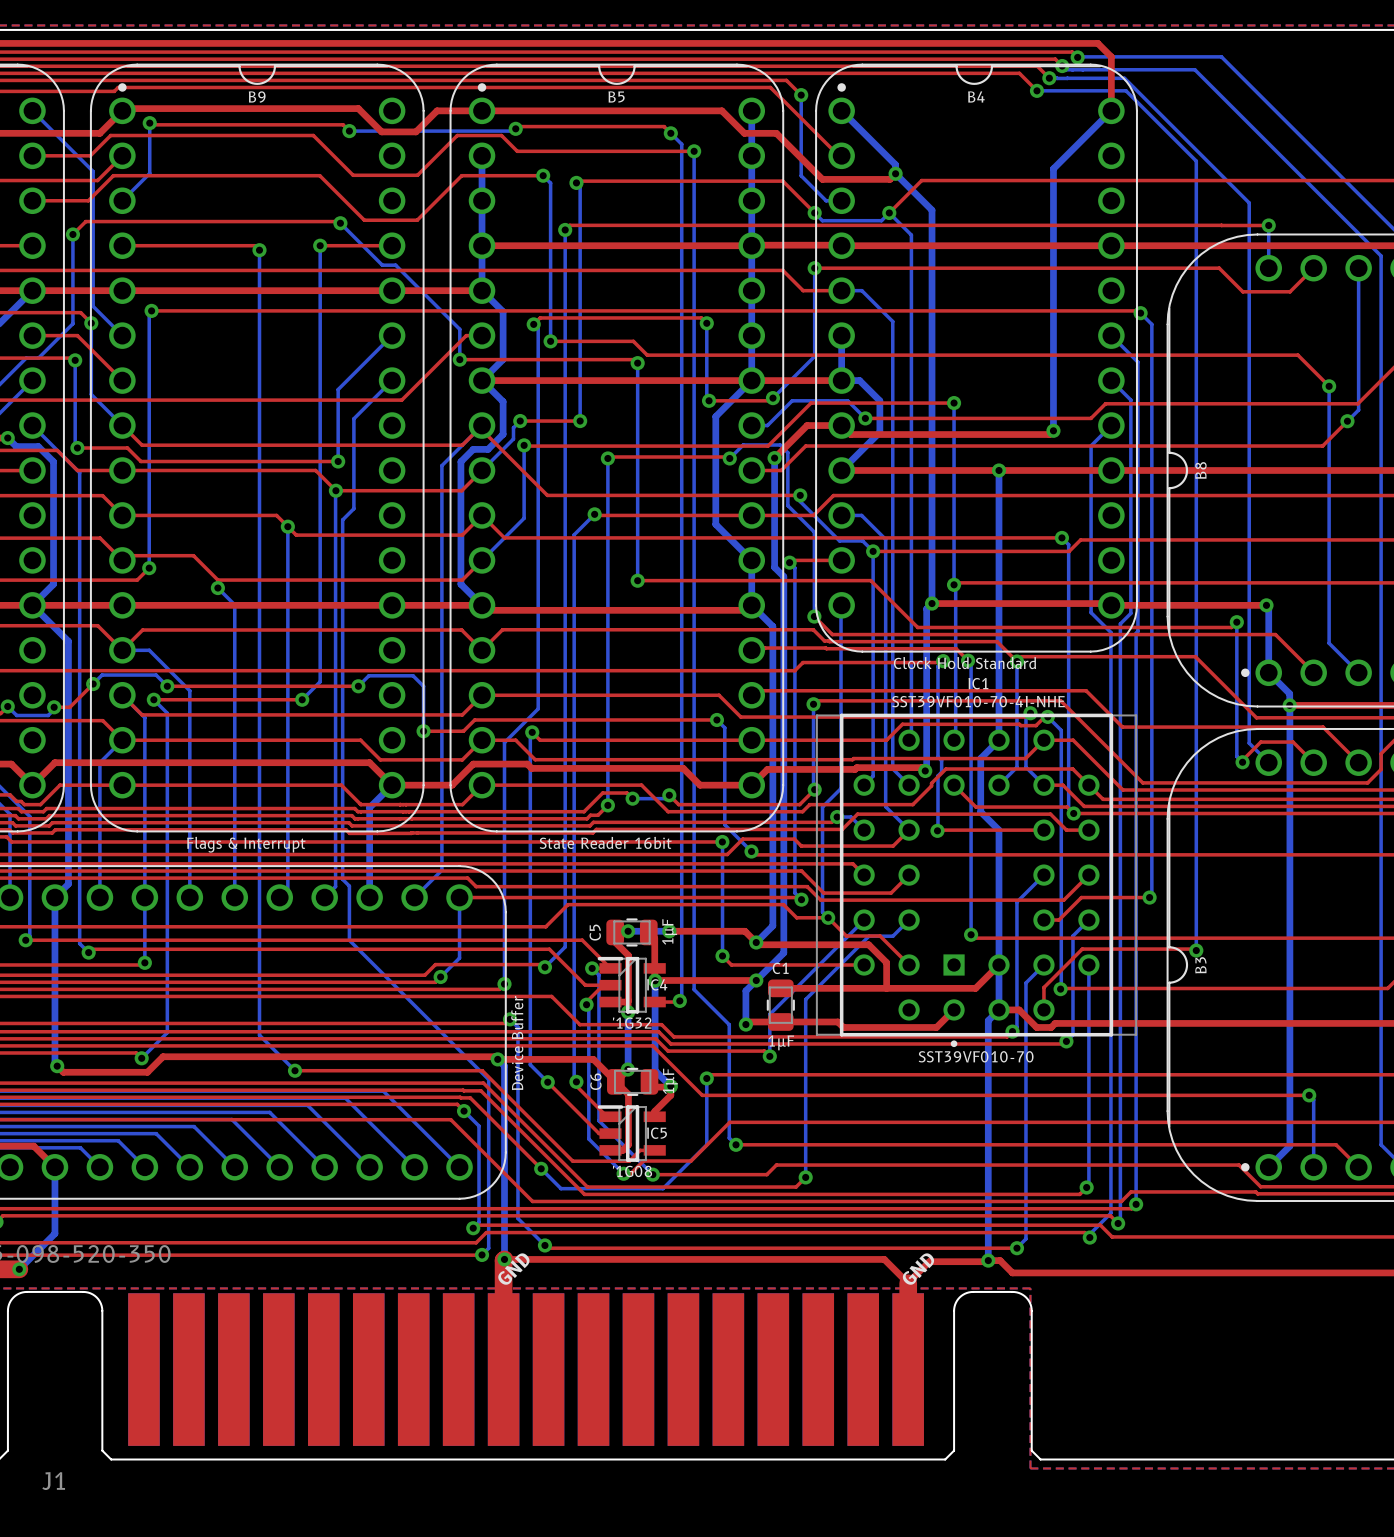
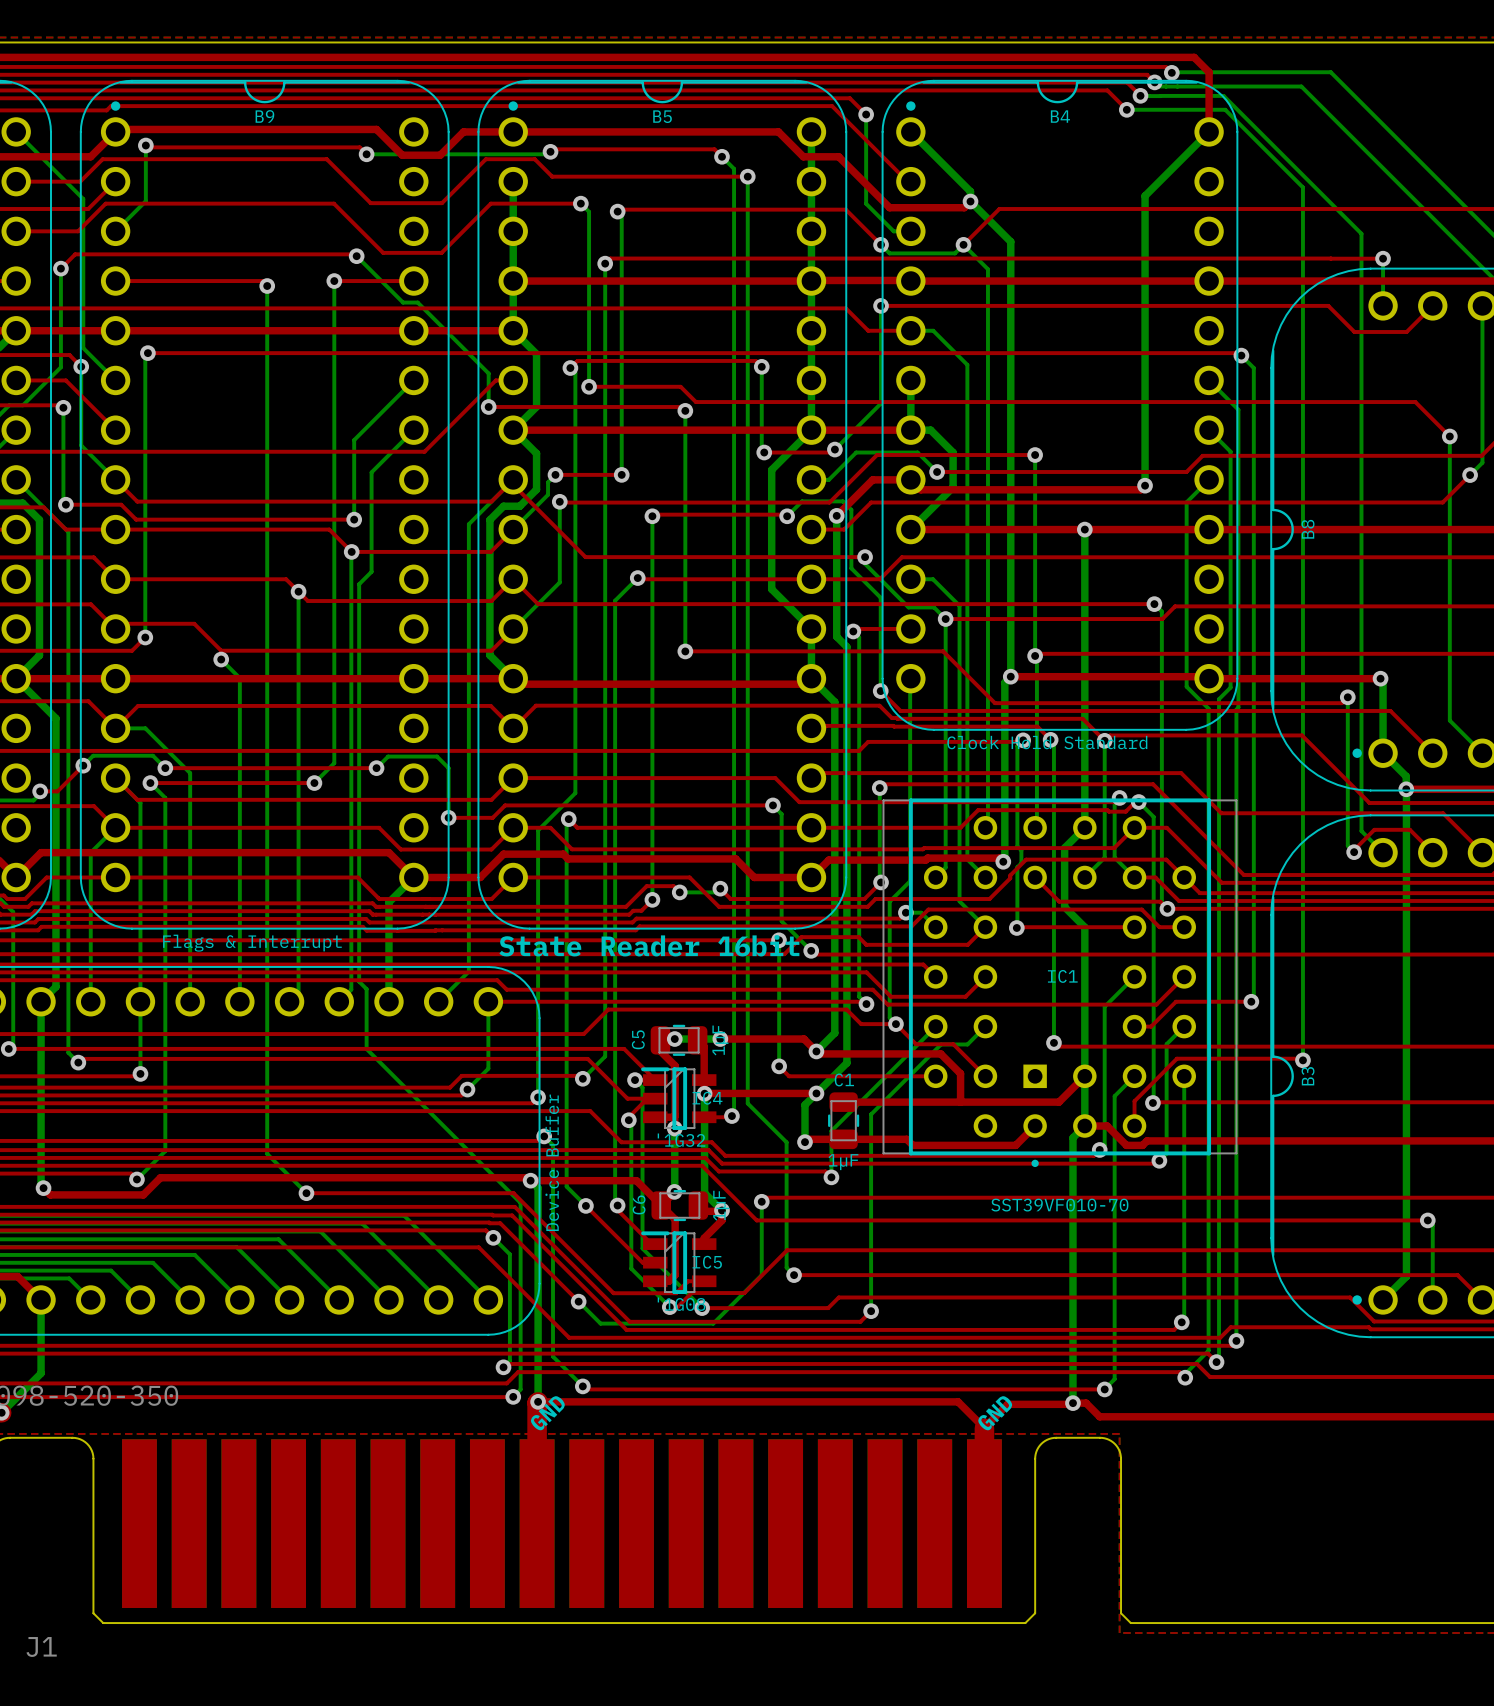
B5 footprint: [449, 63, 785, 833] -> [477, 79, 848, 930]
IC1 name position: IC1 (978, 683) -> IC1 (1062, 976)
IC1 value: SST39VF010-70-4I-NHE (978, 701) -> none
IC1 text position: SST39VF010-70 (976, 1056) -> SST39VF010-70 (1059, 1205)

